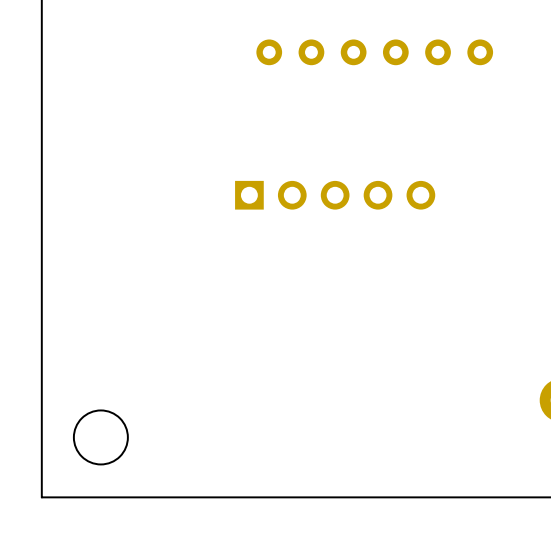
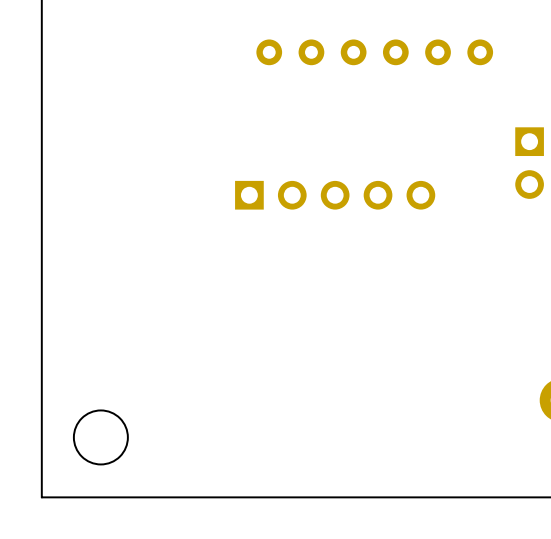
part: none -> (529, 163)

